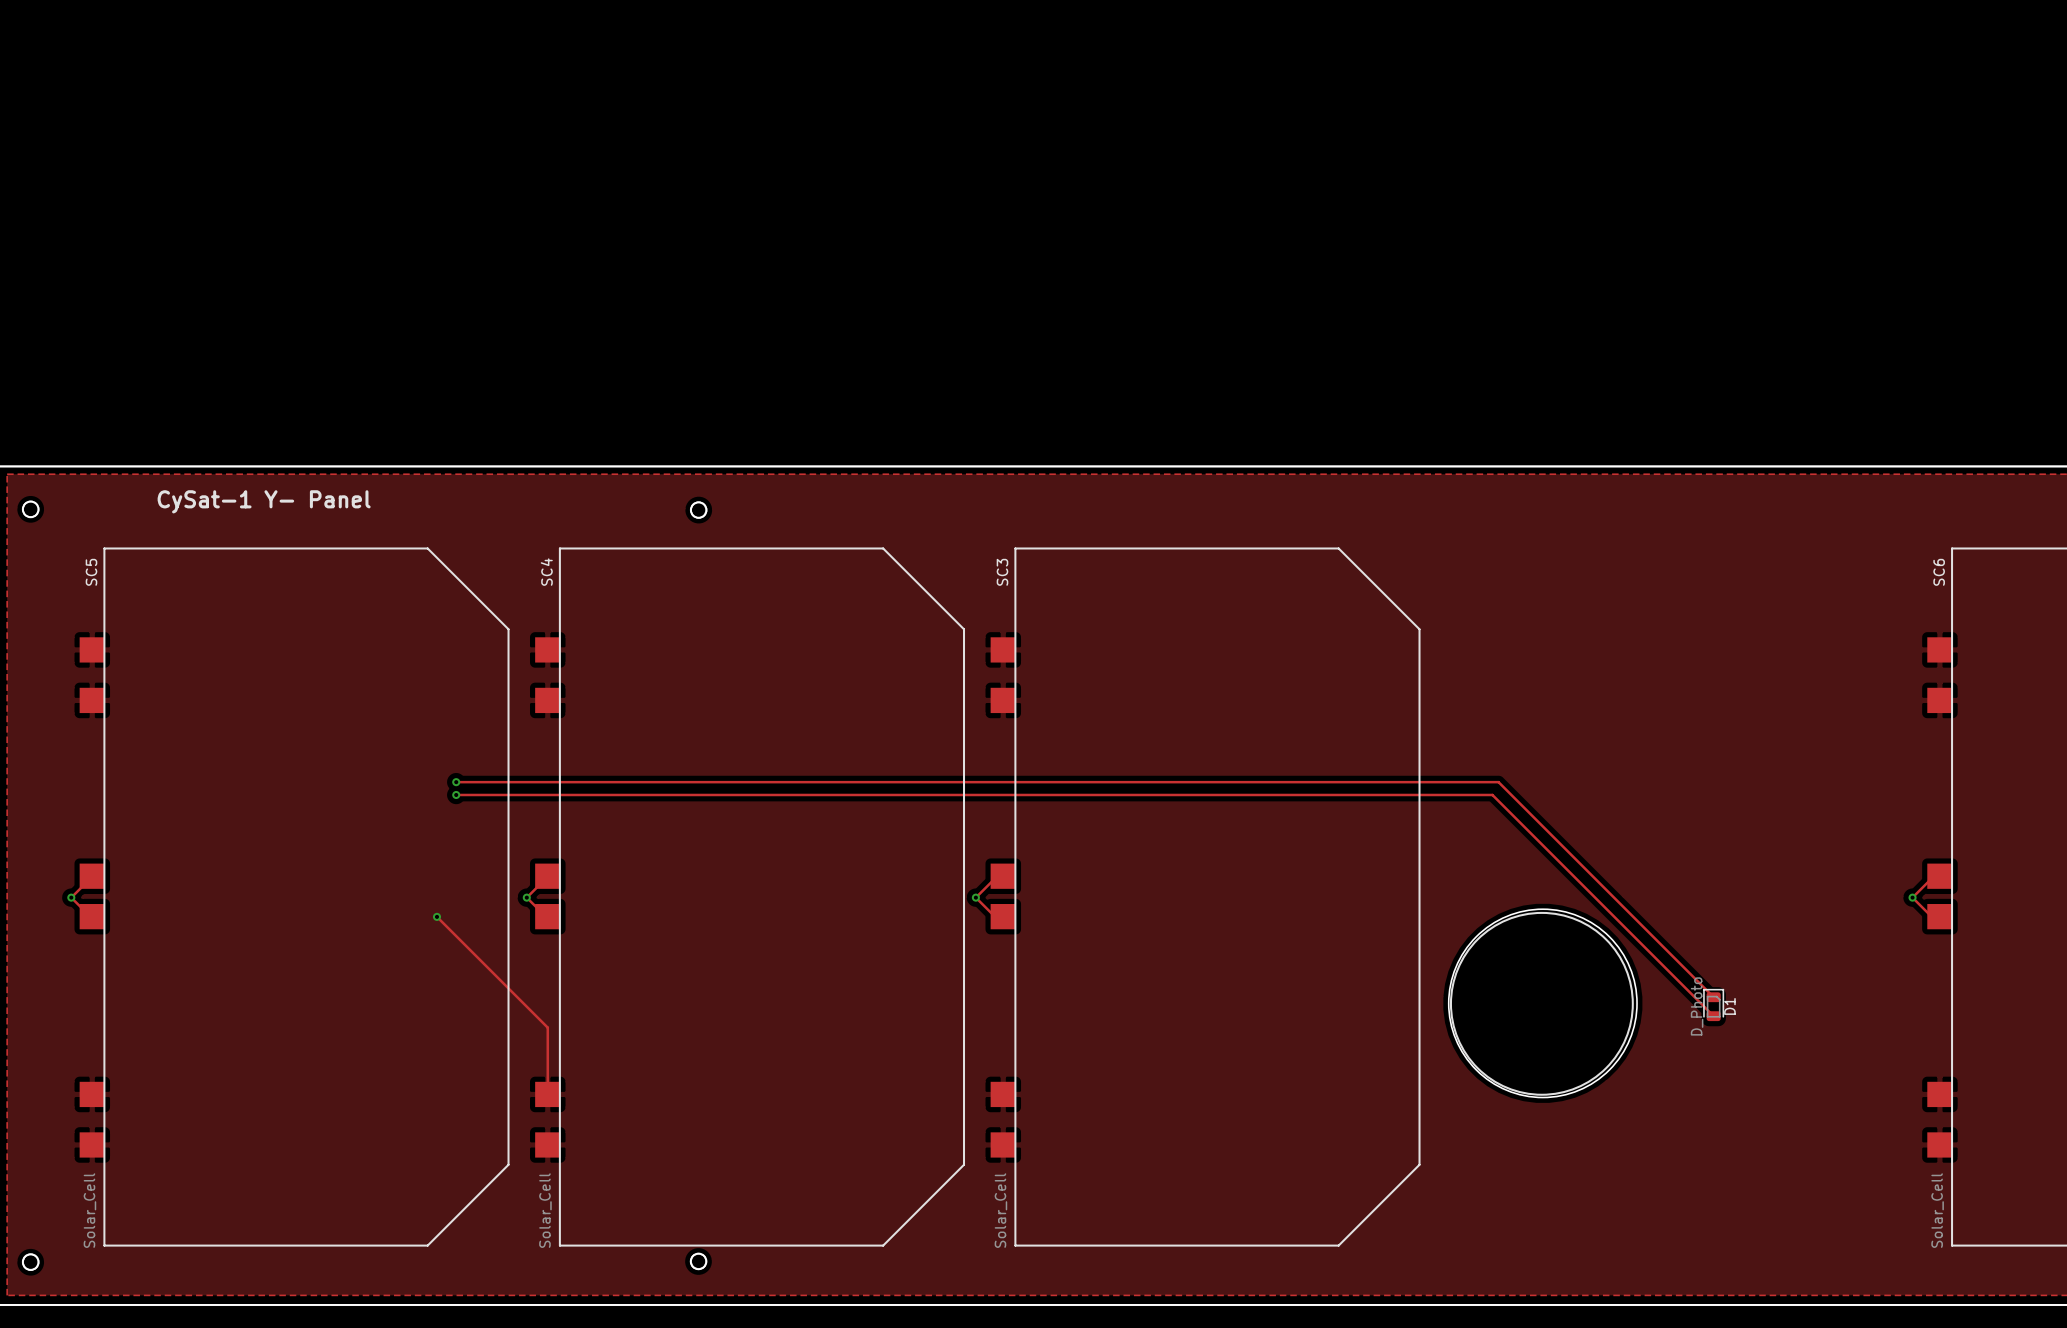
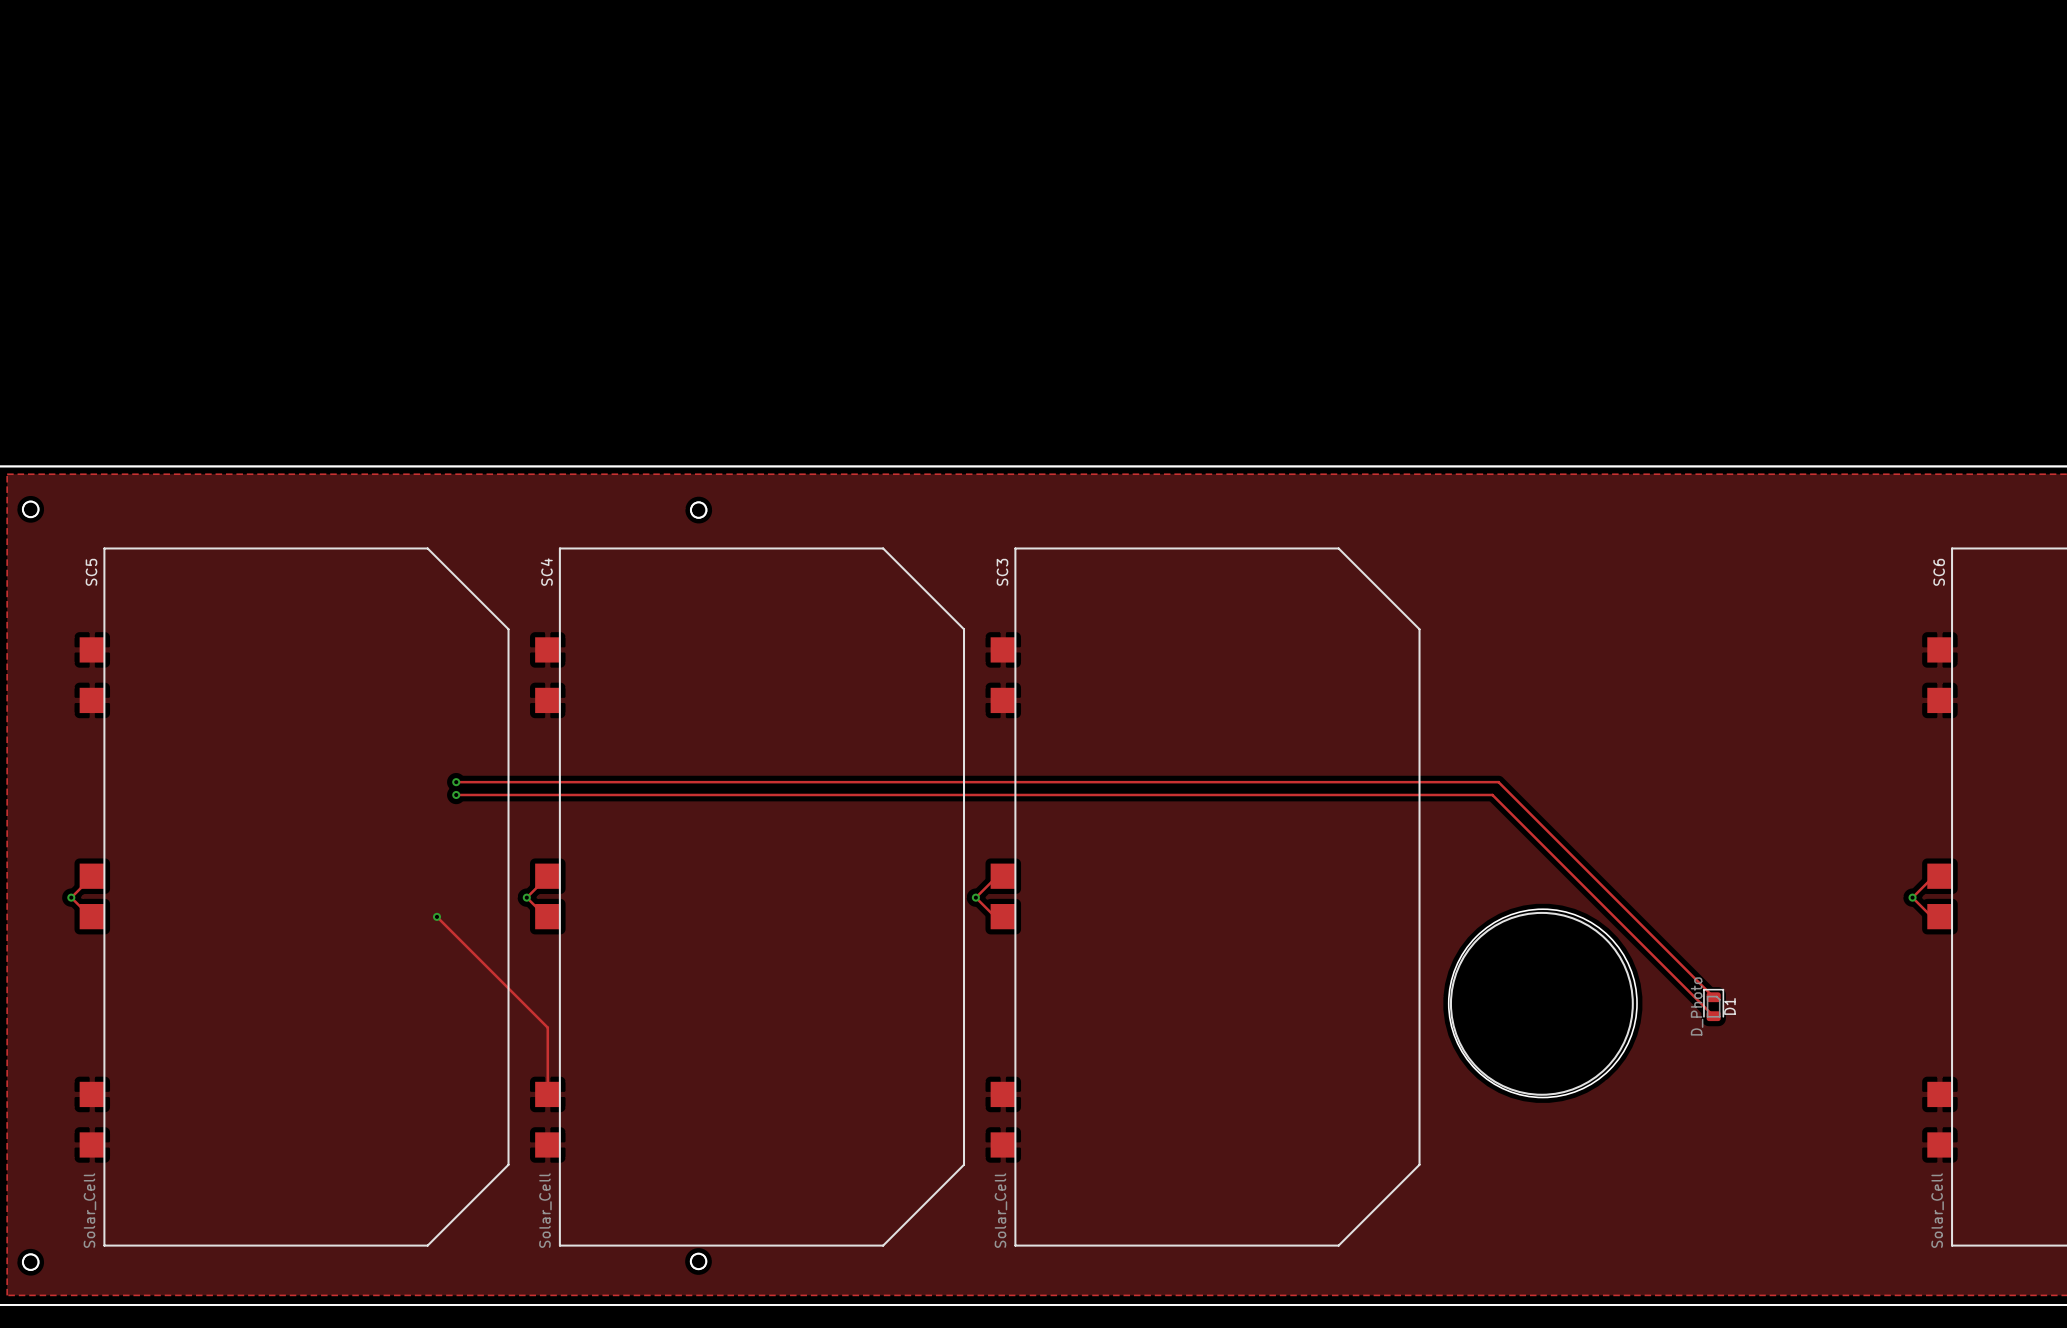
text: CySat-1 Y- Panel (264, 501) -> none

